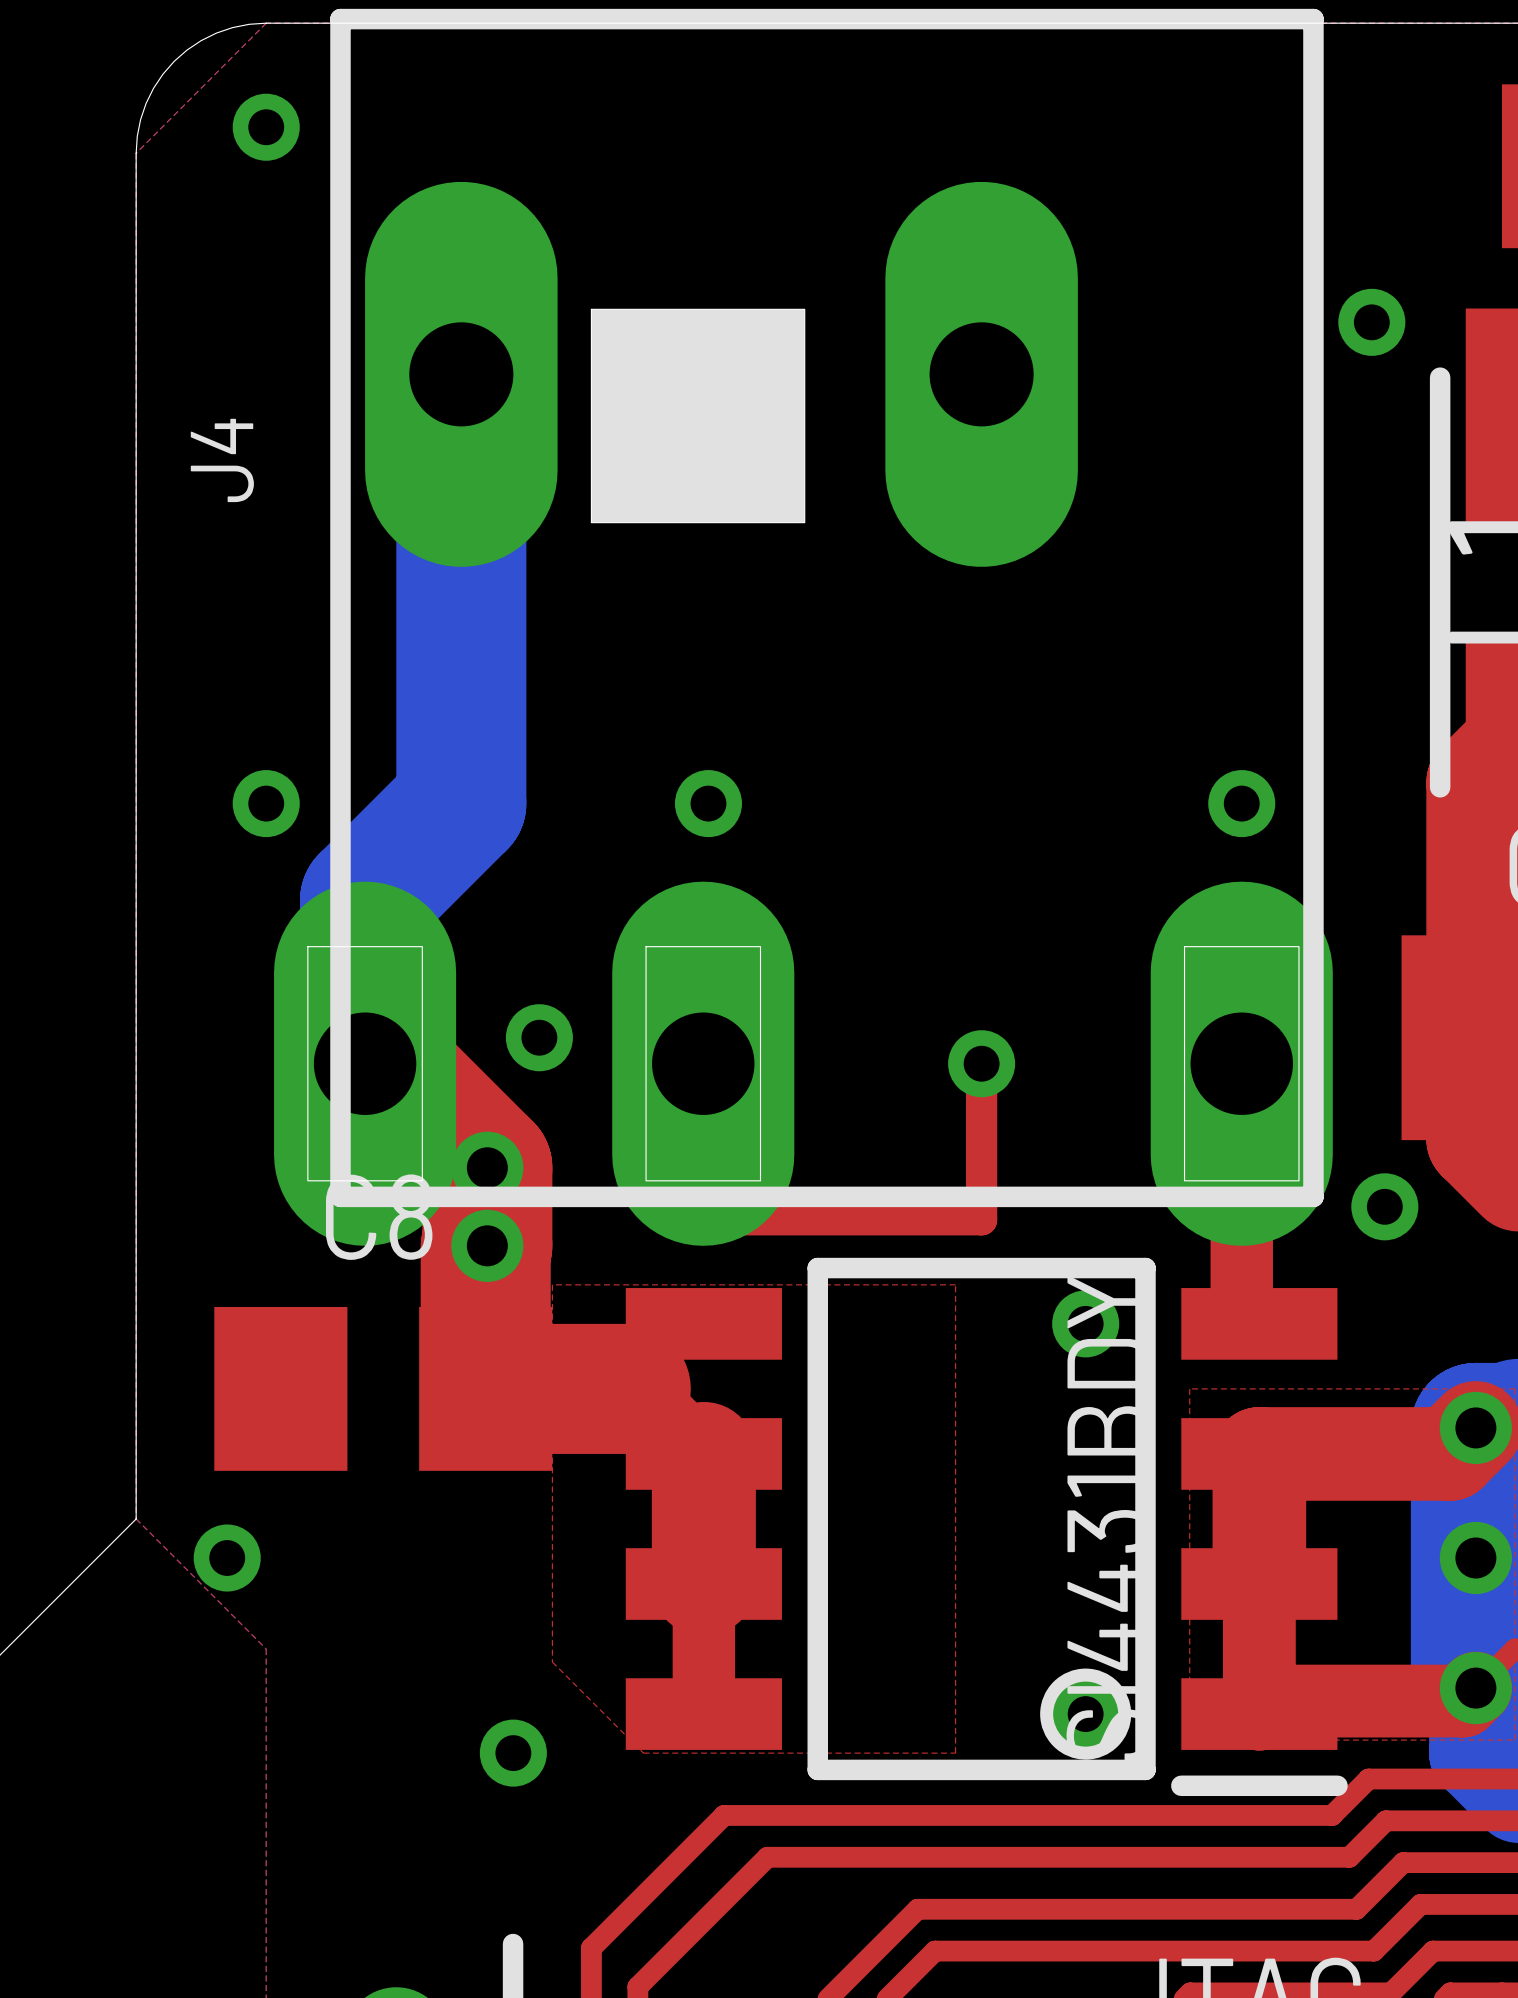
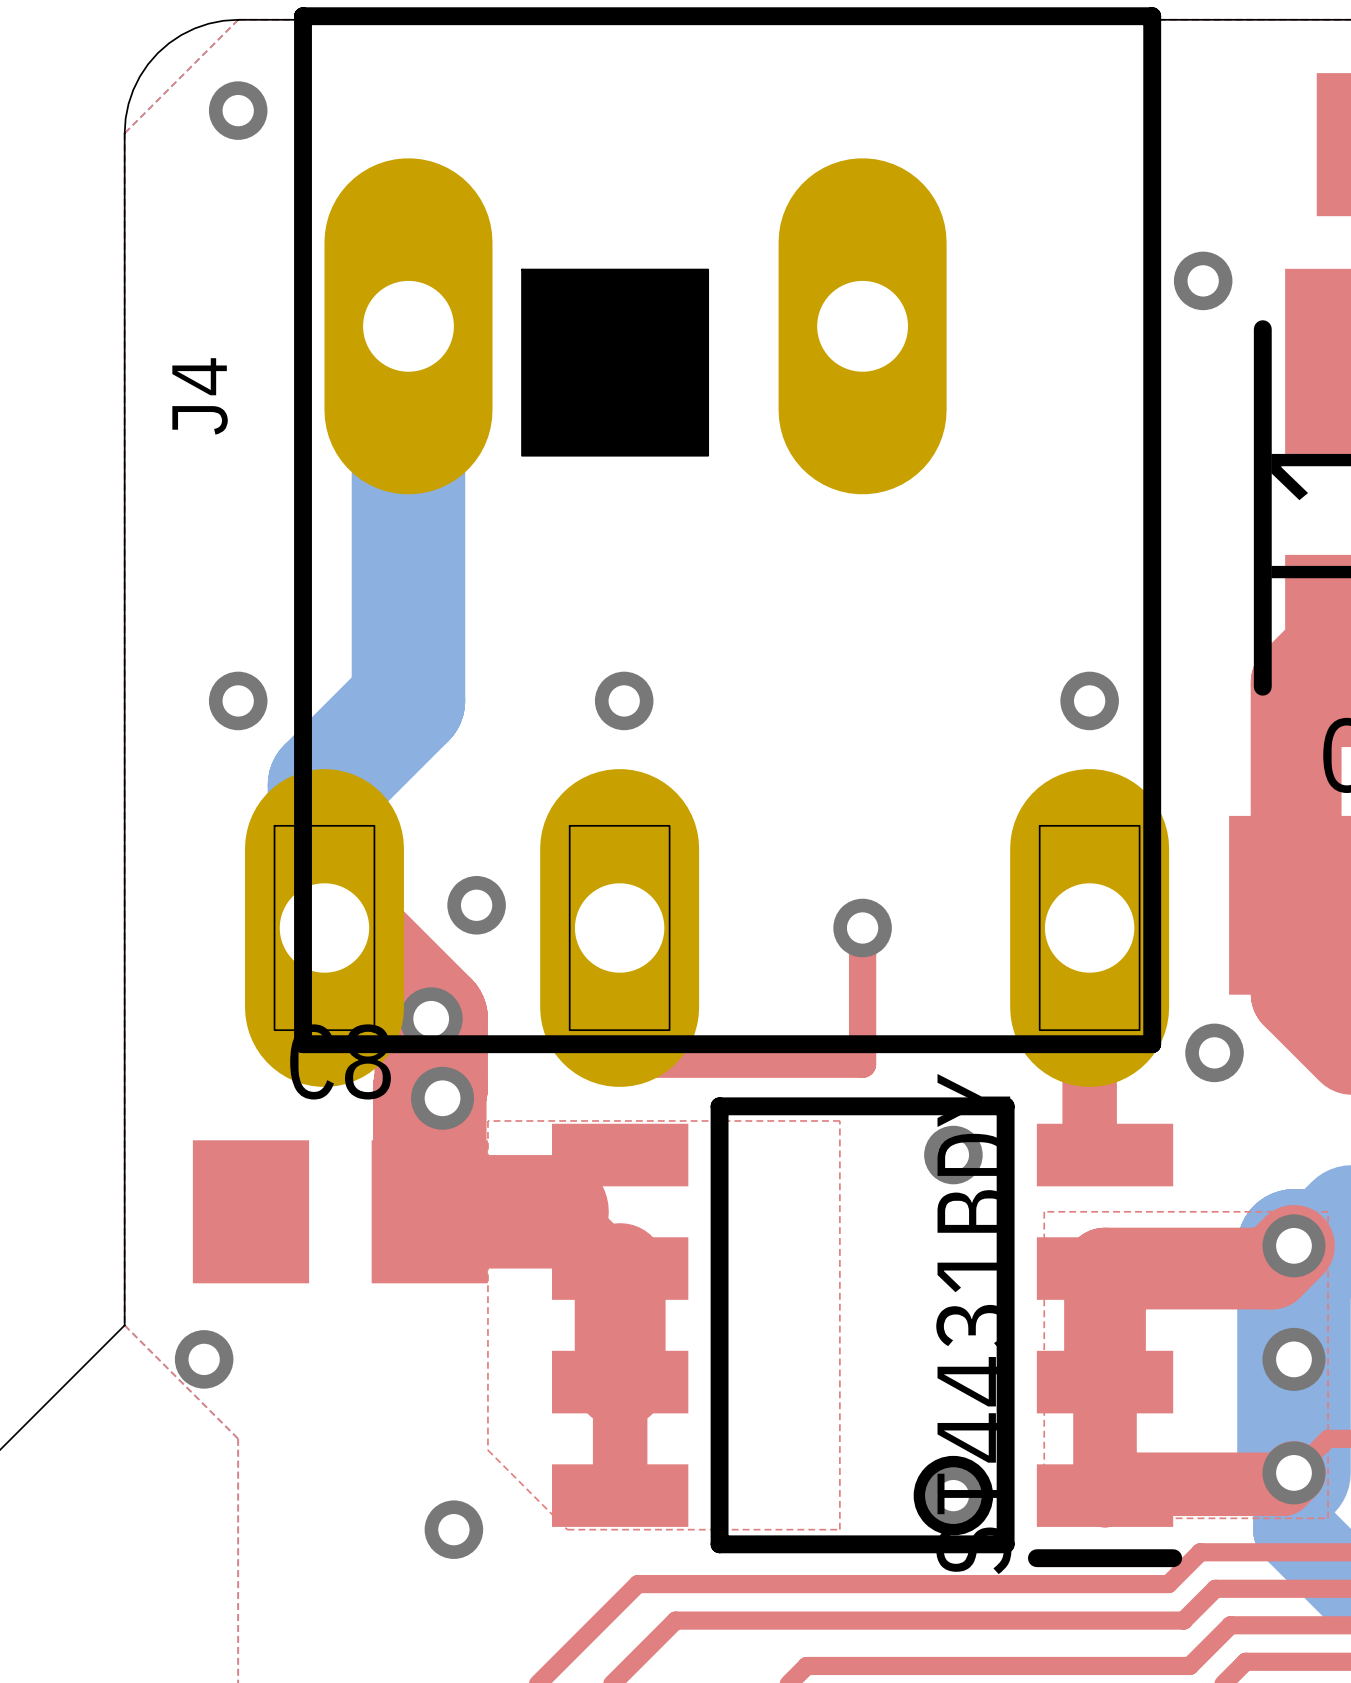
via position: (487, 1245) -> (442, 1098)

